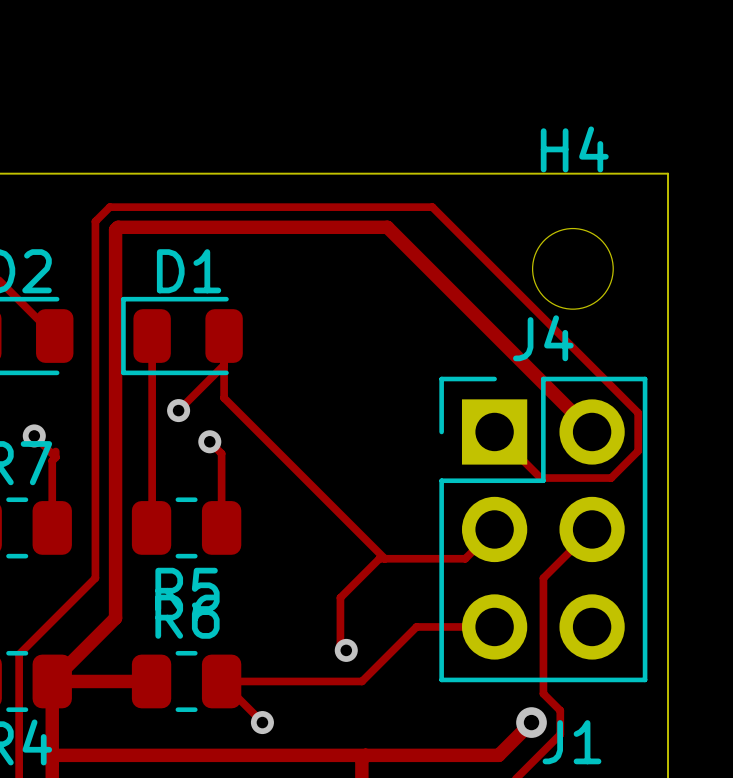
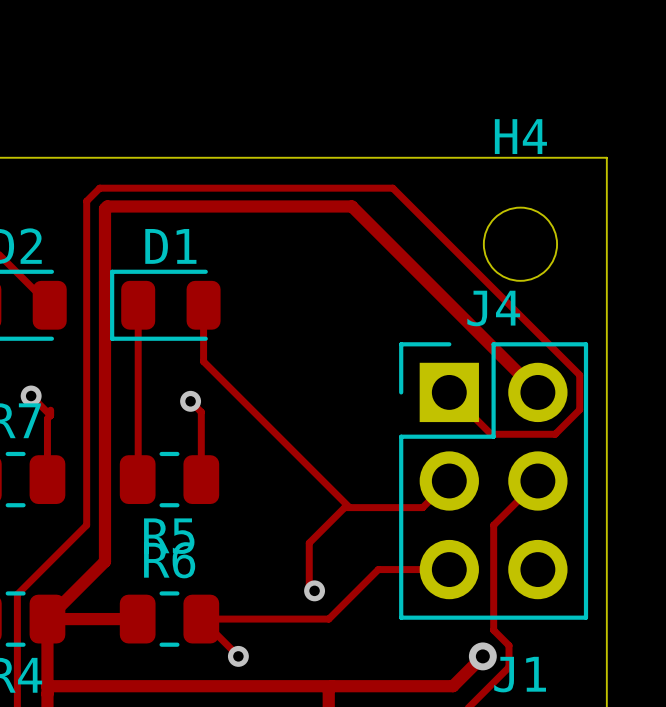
track: (224, 365) (178, 410) -> none
via: (178, 410) -> none

